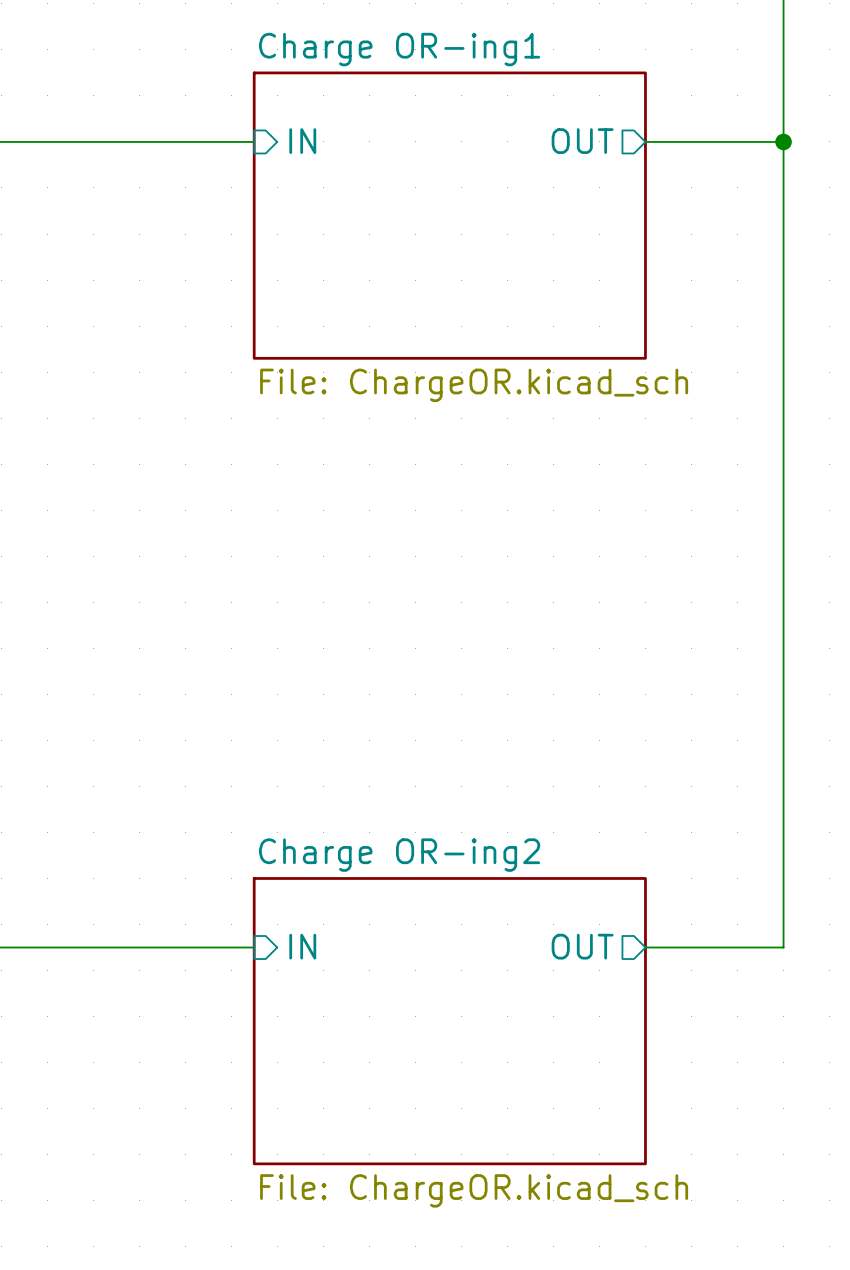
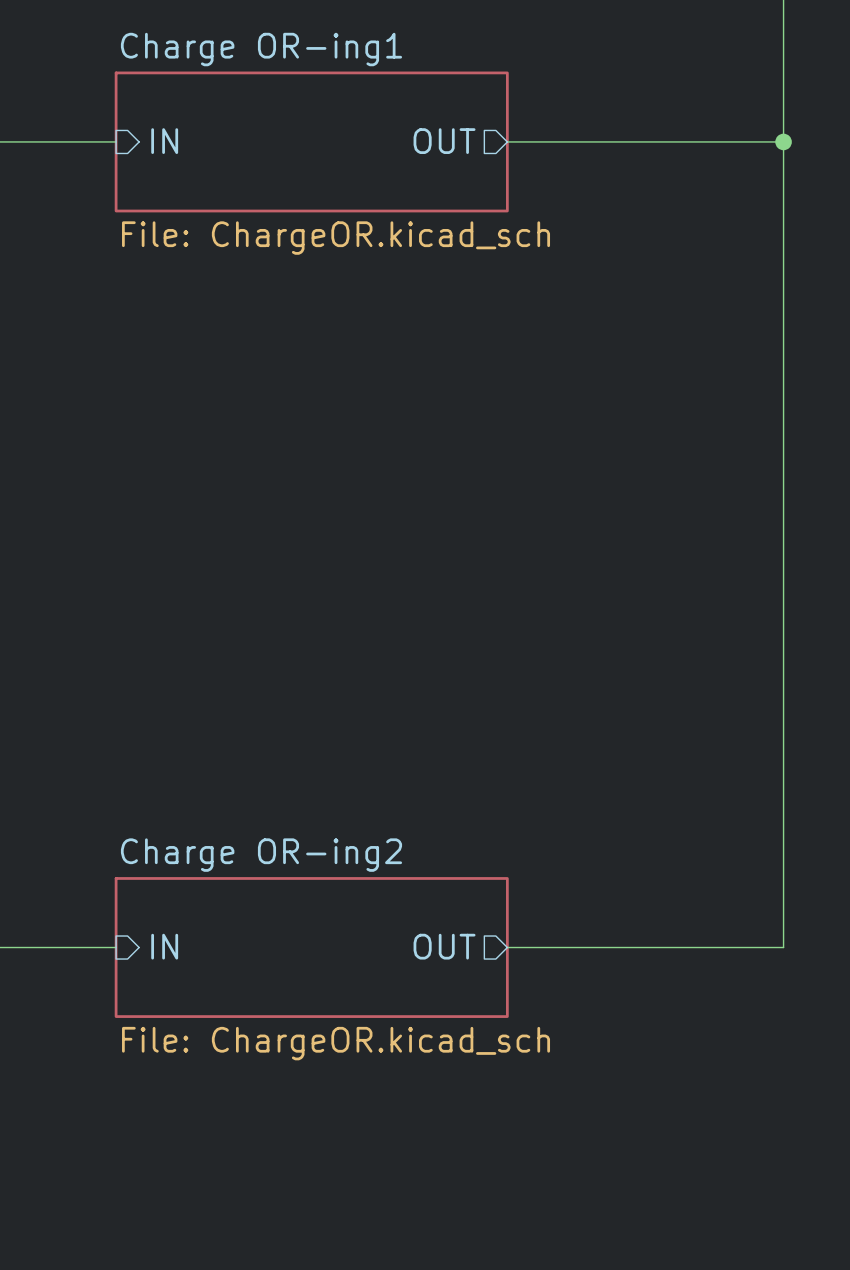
sheet Charge OR-ing1 name position: Charge OR-ing1 (399, 49) -> Charge OR-ing1 (261, 49)
sheet Charge OR-ing1 shape: [252, 71, 647, 360] -> [114, 71, 509, 213]
wire: (116, 141) (254, 141) -> (507, 141) (645, 141)
sheet pin position: IN (302, 141) -> IN (164, 141)
sheet pin position: OUT (582, 141) -> OUT (444, 141)
sheet Charge OR-ing1 value position: File: ChargeOR.kicad_sch (474, 385) -> File: ChargeOR.kicad_sch (336, 238)
sheet Charge OR-ing2 name position: Charge OR-ing2 (399, 855) -> Charge OR-ing2 (261, 855)
sheet Charge OR-ing2 shape: [252, 877, 647, 1166] -> [114, 877, 509, 1018]
sheet pin position: IN (302, 946) -> IN (164, 946)
sheet pin position: OUT (582, 946) -> OUT (444, 946)
wire: (116, 947) (254, 947) -> (507, 947) (645, 947)
sheet Charge OR-ing2 value position: File: ChargeOR.kicad_sch (474, 1190) -> File: ChargeOR.kicad_sch (336, 1043)

